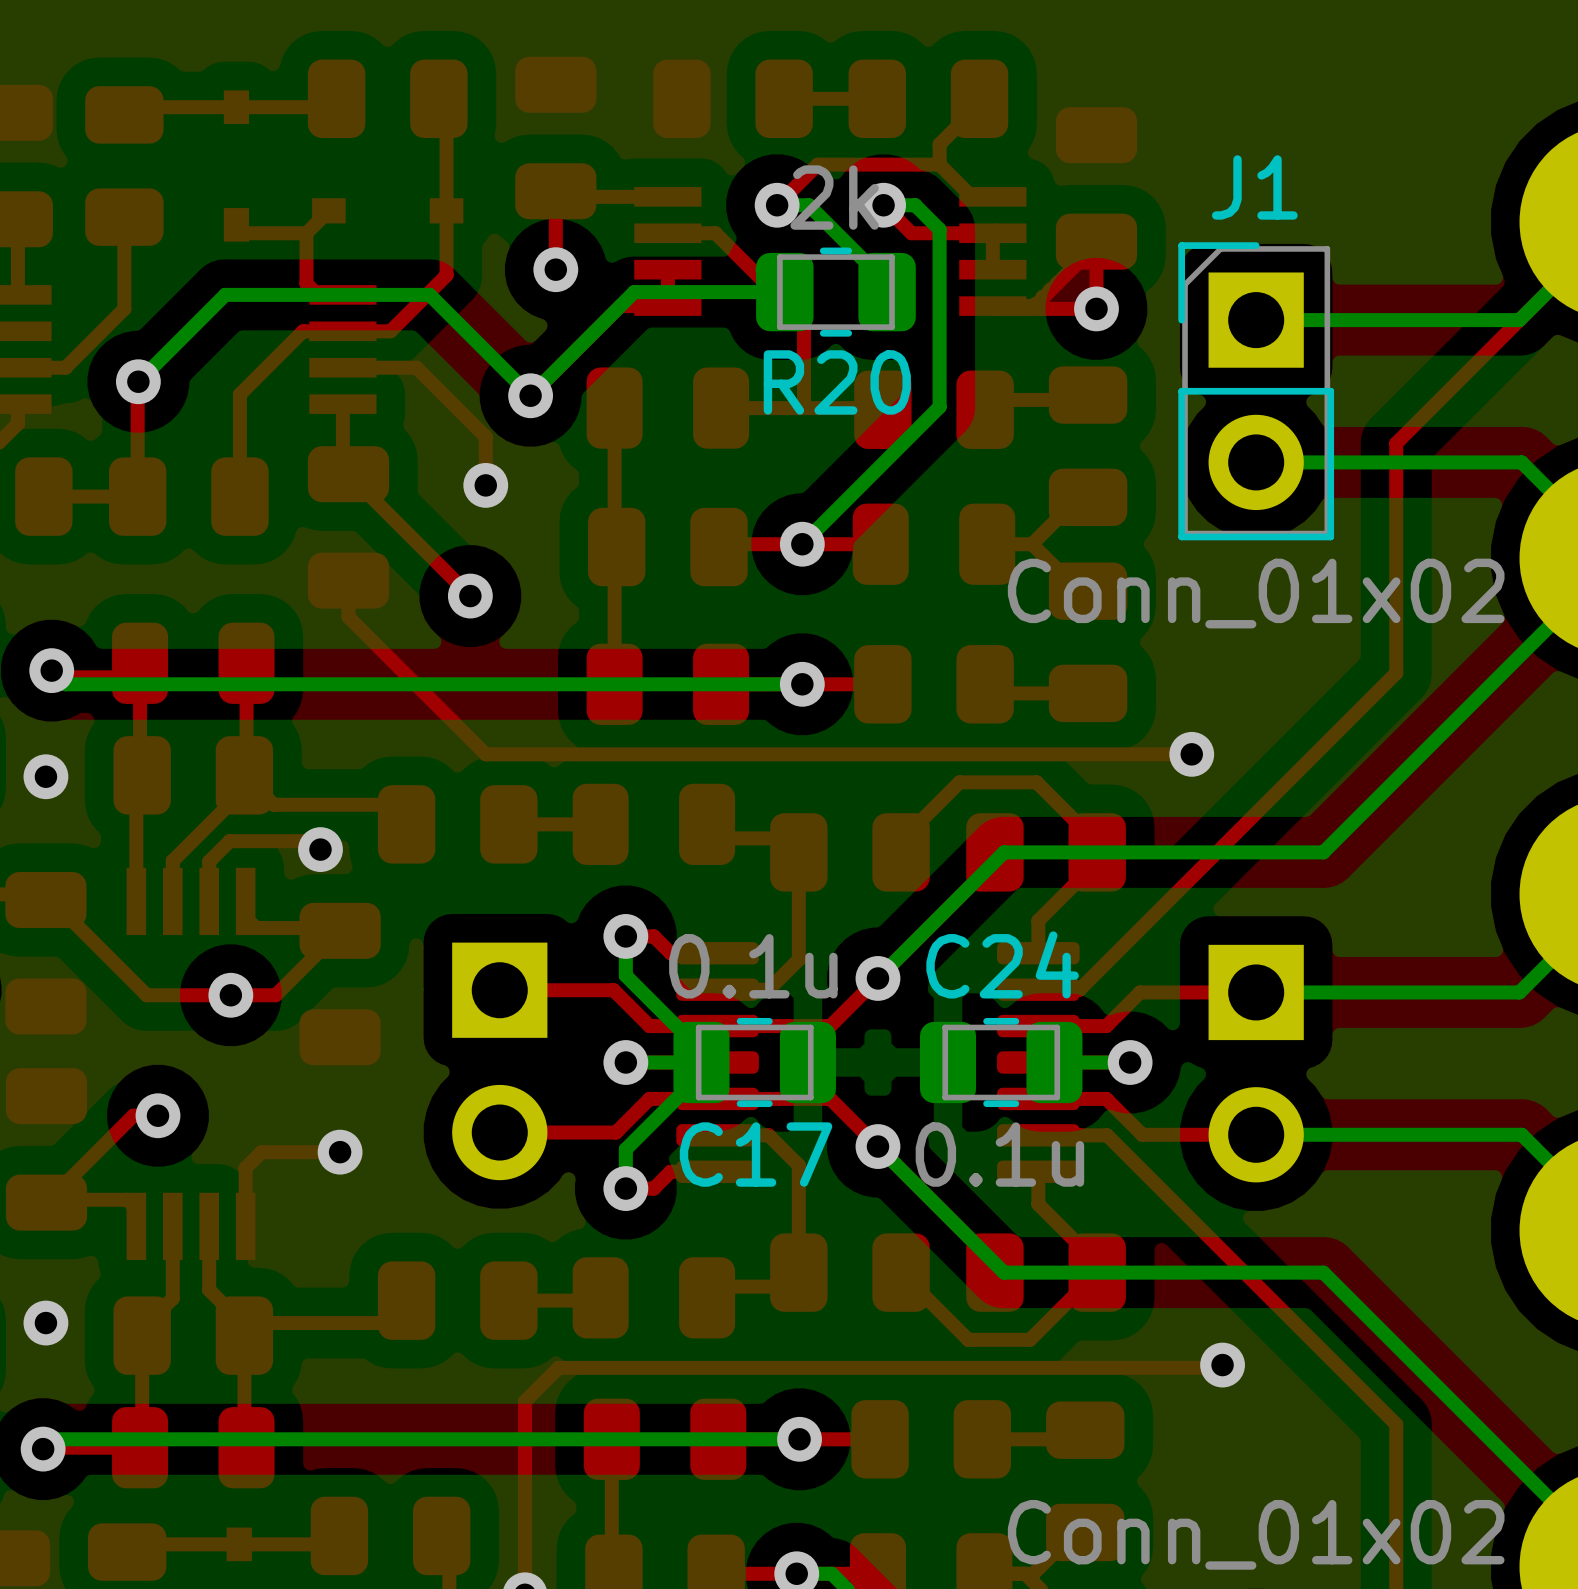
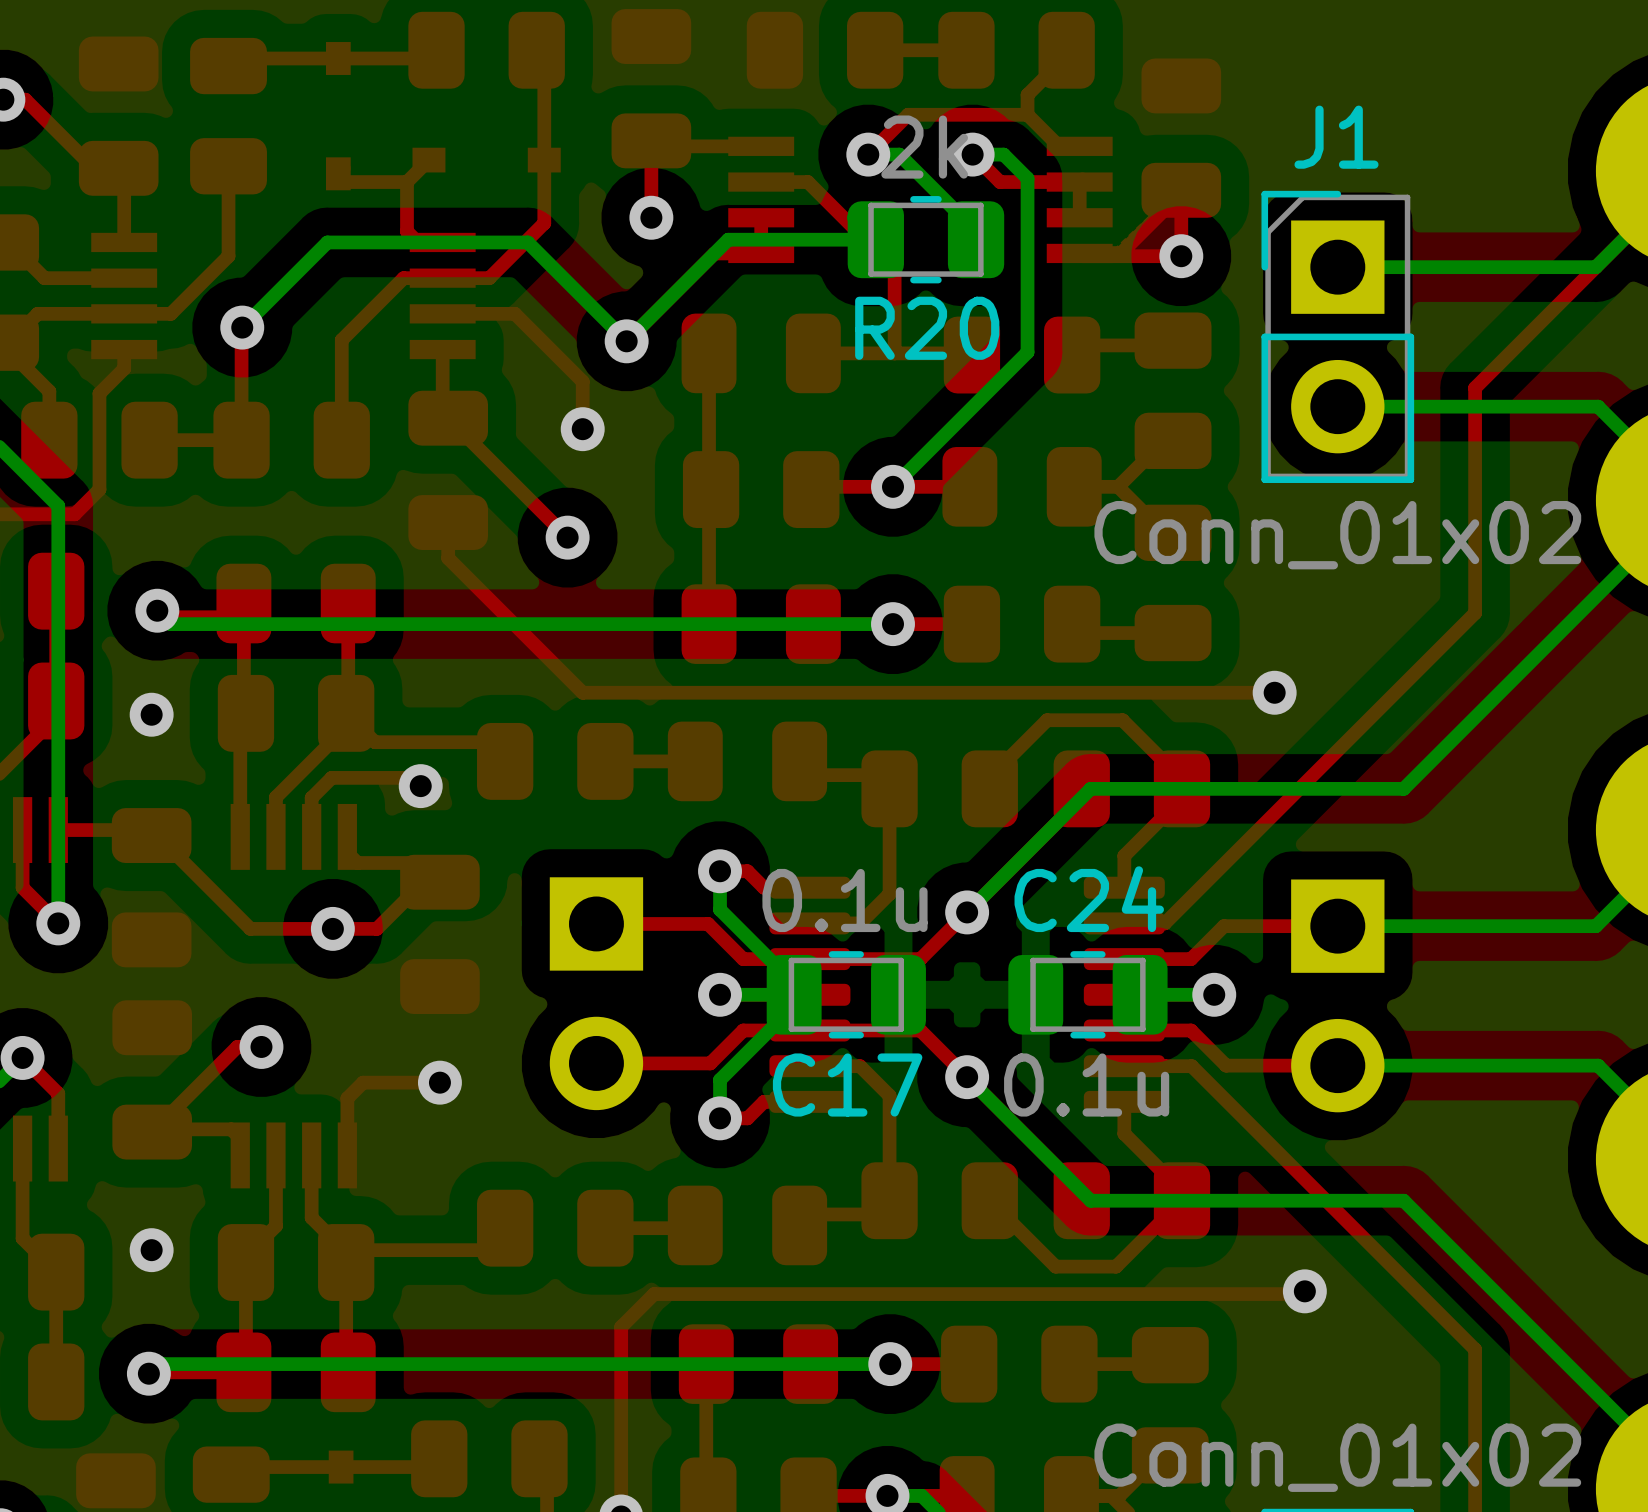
part position: (340, 984) -> (439, 934)

